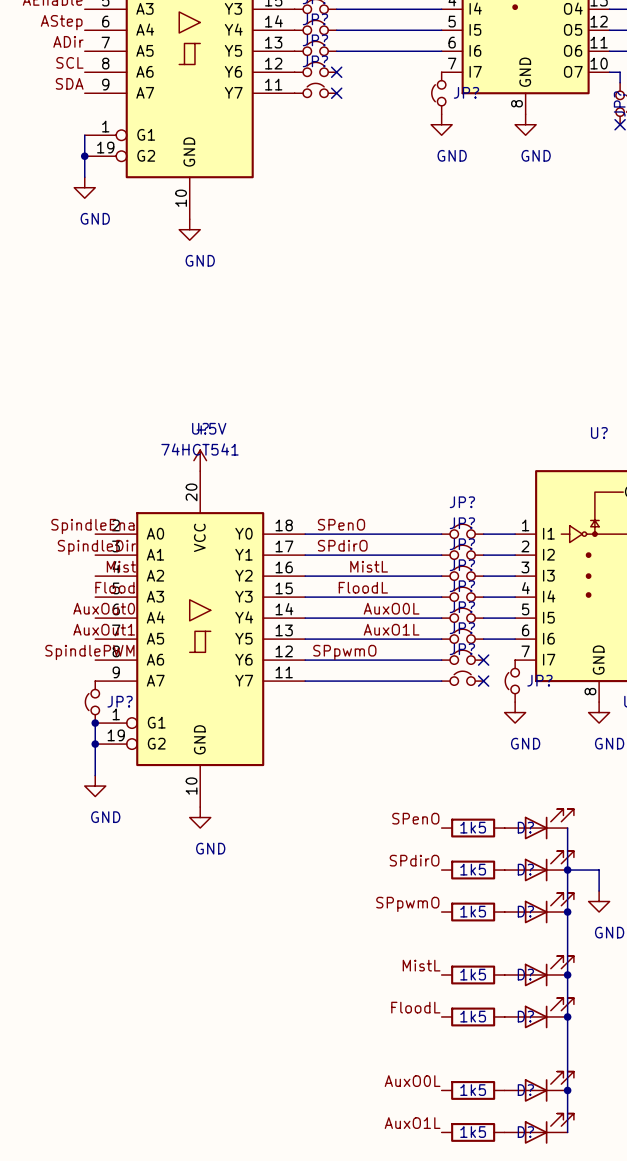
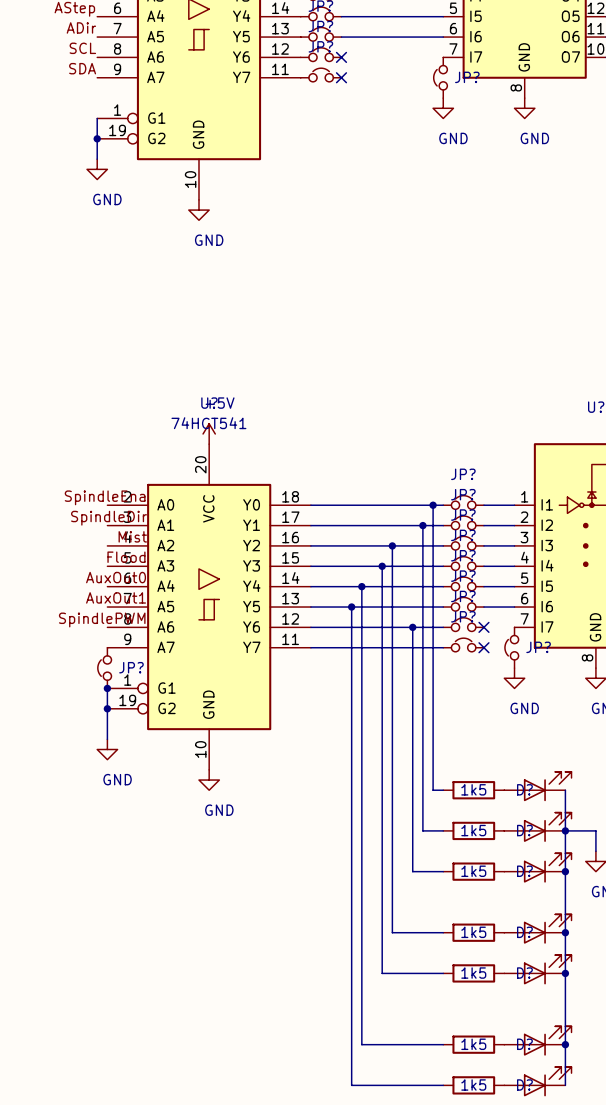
label: SPenO (341, 524) -> none
wire: none -> (433, 505) (433, 790) (443, 790)
junction: none -> (433, 505)
label: SPdirO (342, 545) -> none
wire: none -> (422, 525) (422, 830) (443, 830)
junction: none -> (422, 525)
label: MistL (369, 566) -> none
wire: none -> (392, 545) (392, 932) (443, 932)
junction: none -> (392, 545)
label: FloodL (363, 587) -> none
wire: none -> (382, 566) (382, 973) (443, 973)
junction: none -> (382, 566)
label: AuxO0L (391, 608) -> none
wire: none -> (361, 586) (361, 1044) (443, 1044)
junction: none -> (361, 586)
label: AuxO1L (391, 629) -> none
wire: none -> (351, 607) (351, 1085) (443, 1085)
junction: none -> (351, 607)
label: SPpwmO (344, 652) -> none
wire: none -> (412, 627) (412, 871) (443, 871)
junction: none -> (412, 627)
label: SPenO (415, 818) -> none
label: SPdirO (414, 860) -> none
label: SPpwmO (407, 904) -> none
label: MistL (421, 965) -> none
label: FloodL (415, 1007) -> none
label: AuxO0L (412, 1081) -> none
label: AuxO1L (412, 1123) -> none

